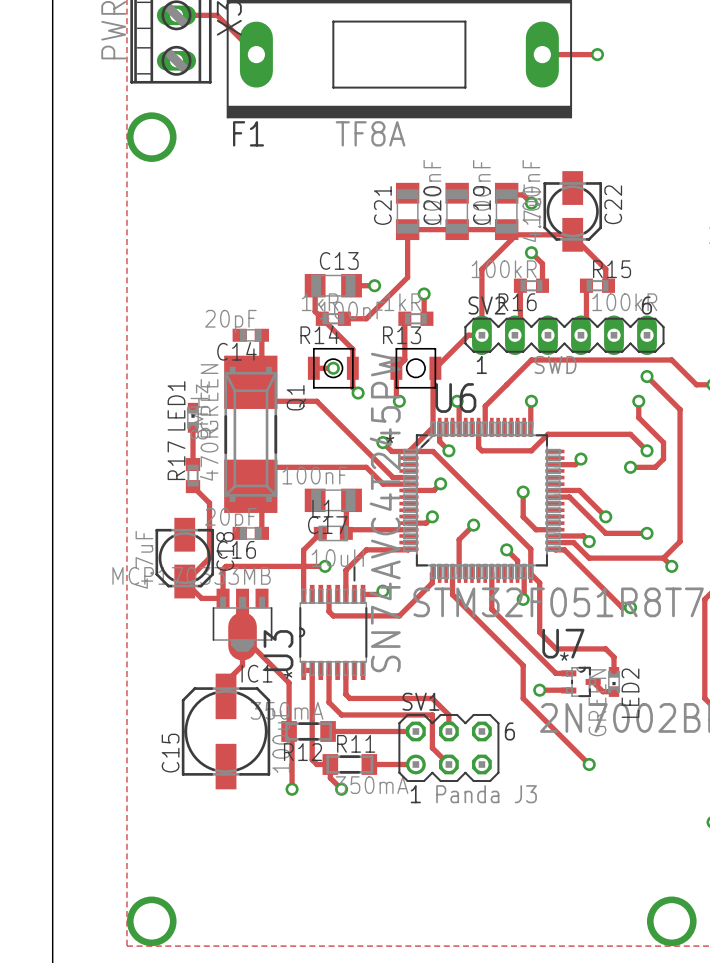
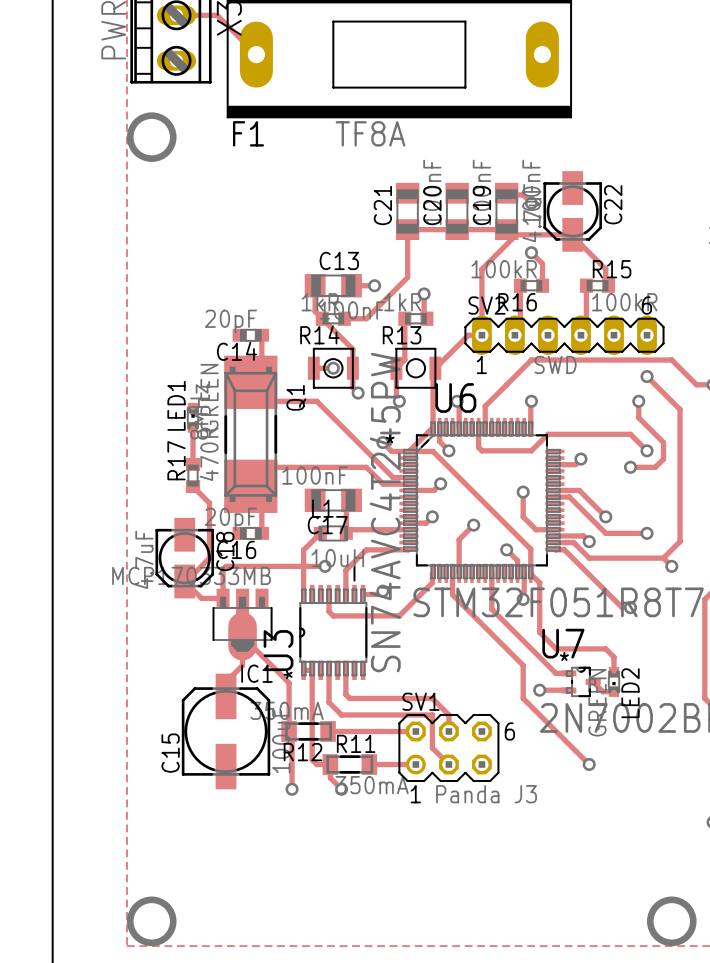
track: (542, 54) (597, 54) -> none
via: (597, 54) -> none

